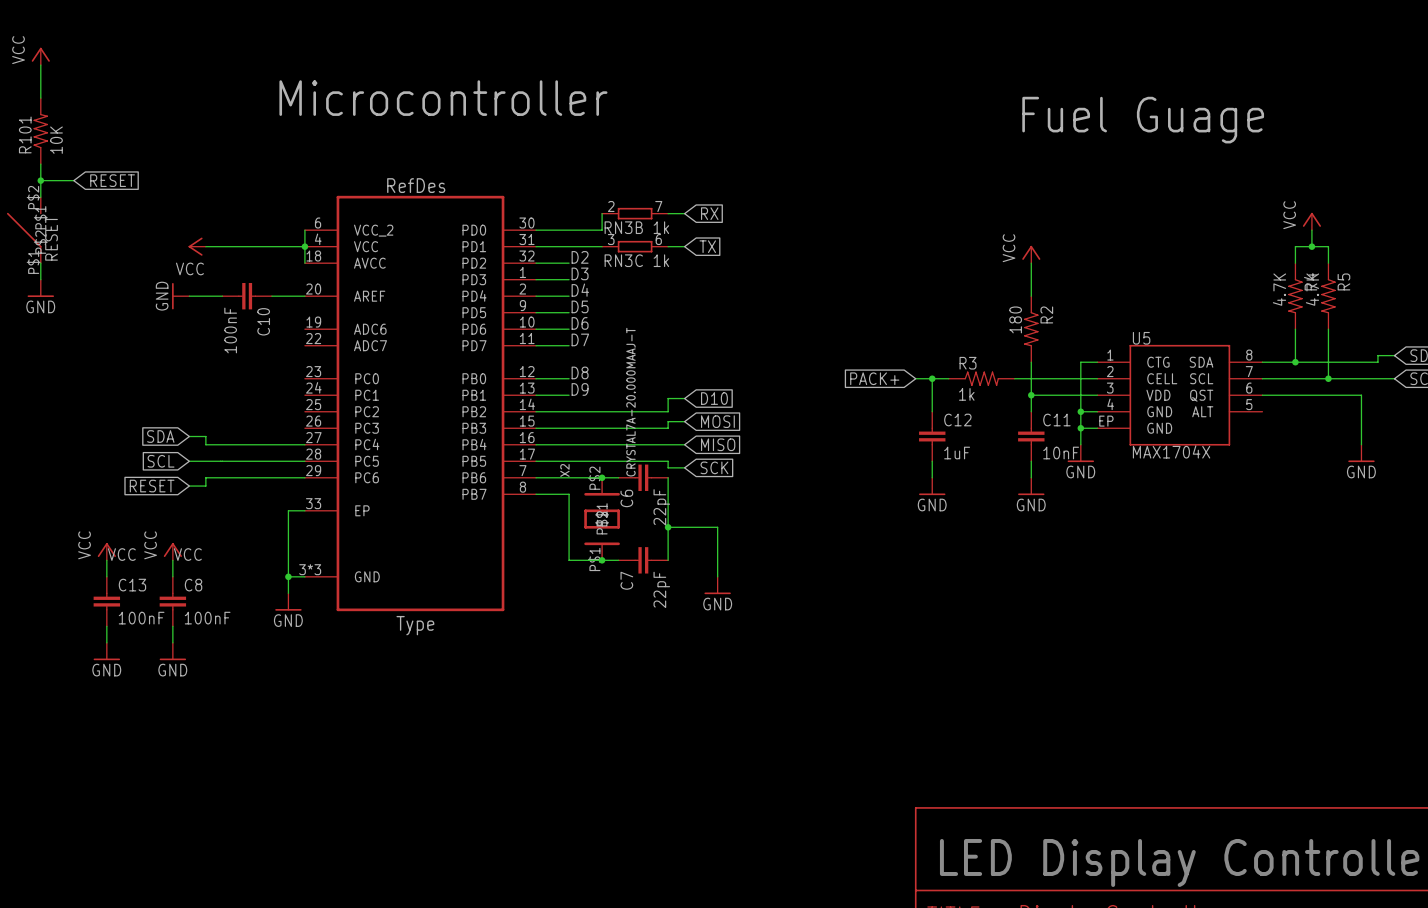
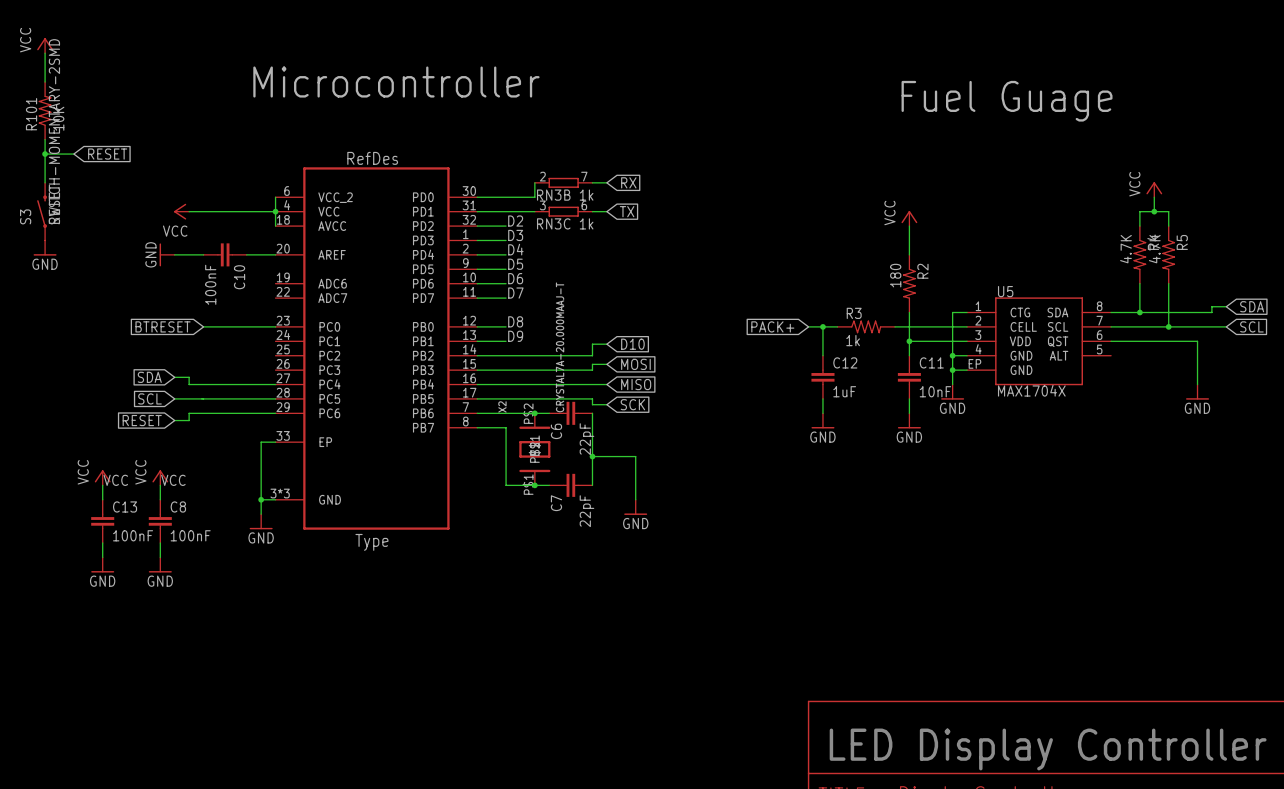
part: (24, 230) -> none
S3: none -> SWITCH-MOMENTARY-2SMD (42, 211)
global label: none -> BTRESET (163, 326)
wire: none -> (203, 326) (275, 326)

